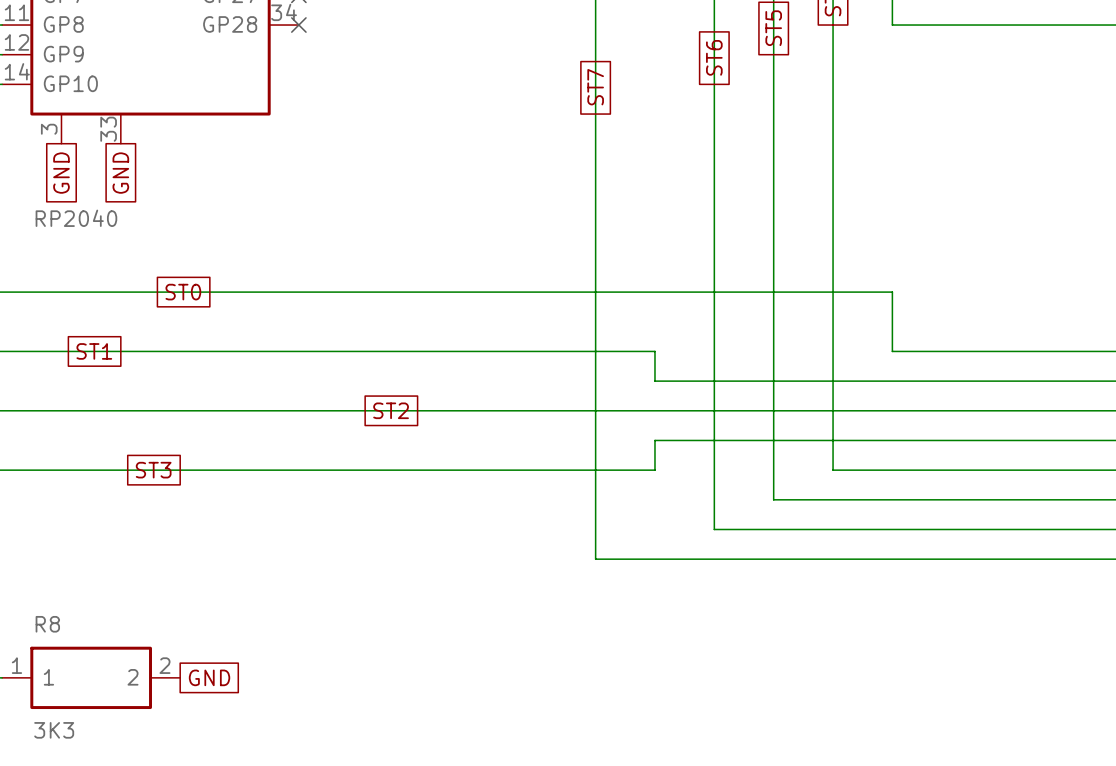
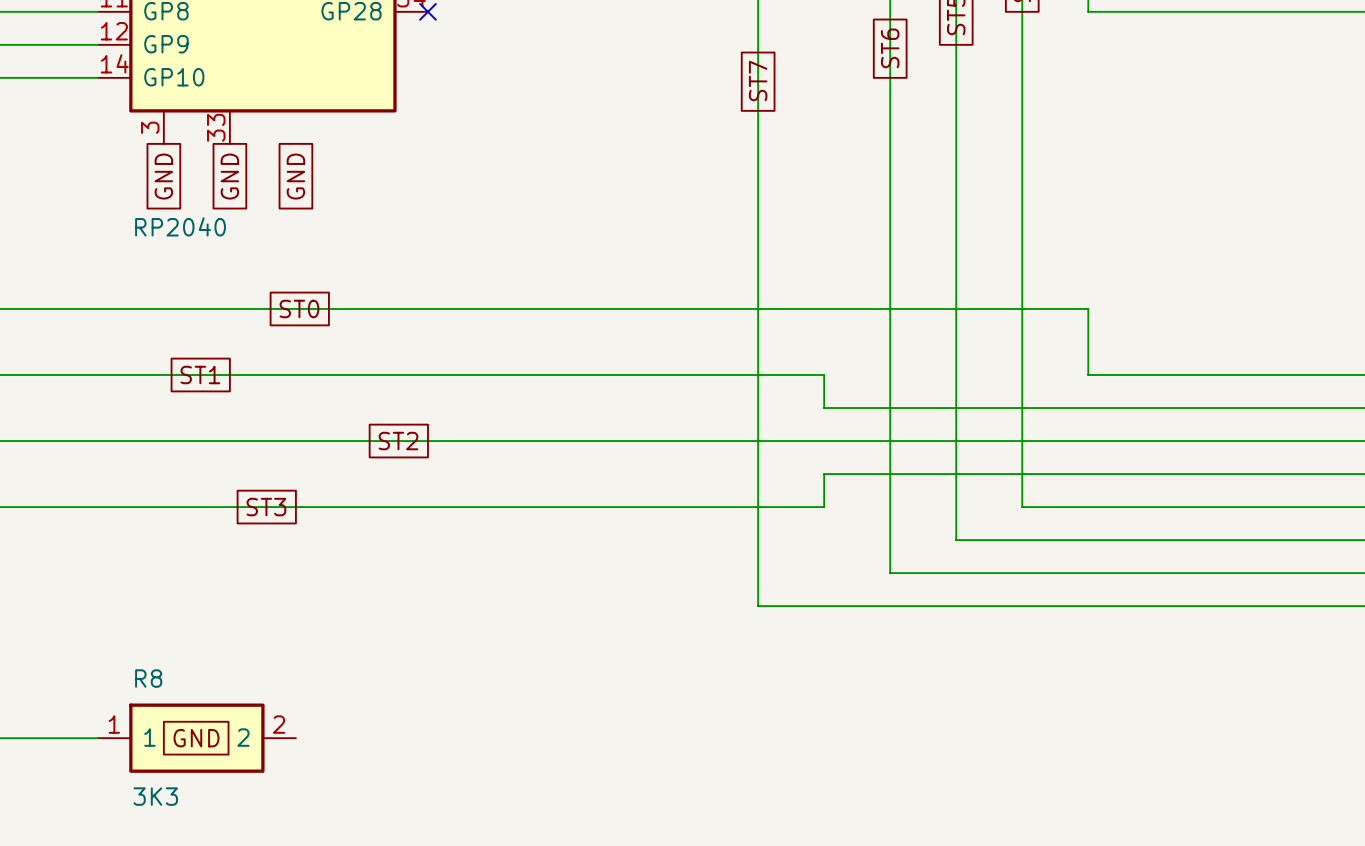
global label: none -> GND (295, 176)
global label position: ST2 (391, 410) -> ST2 (398, 441)
global label position: GND (209, 677) -> GND (196, 738)

